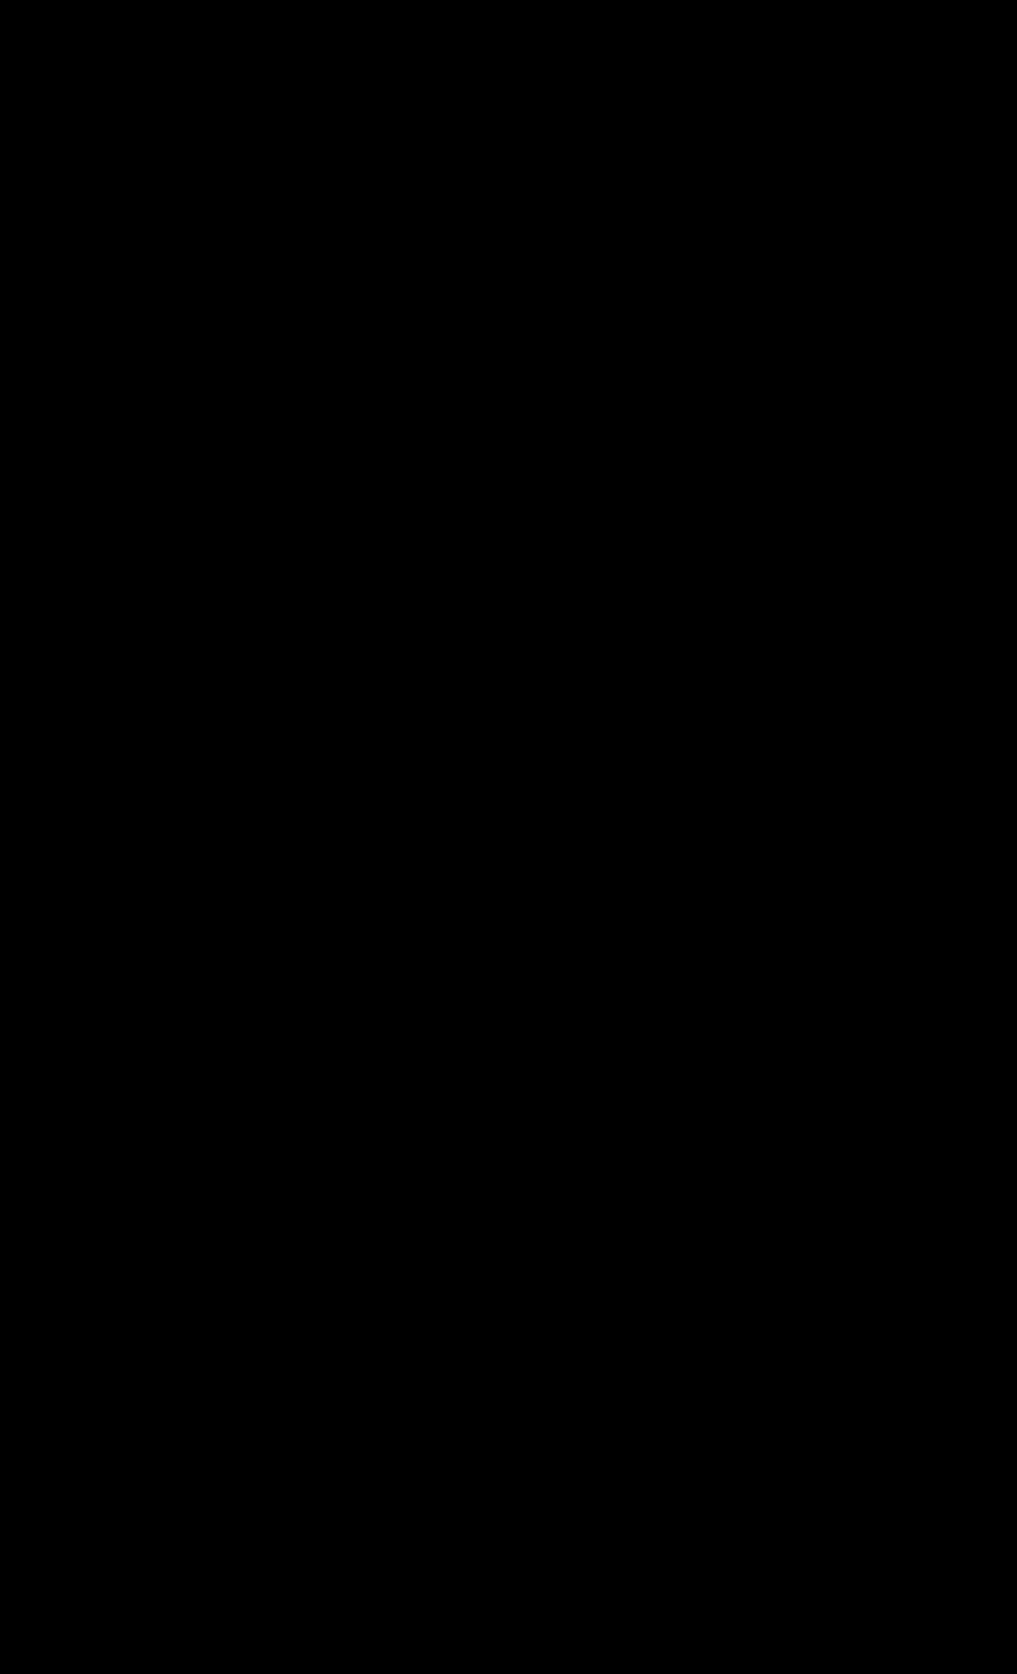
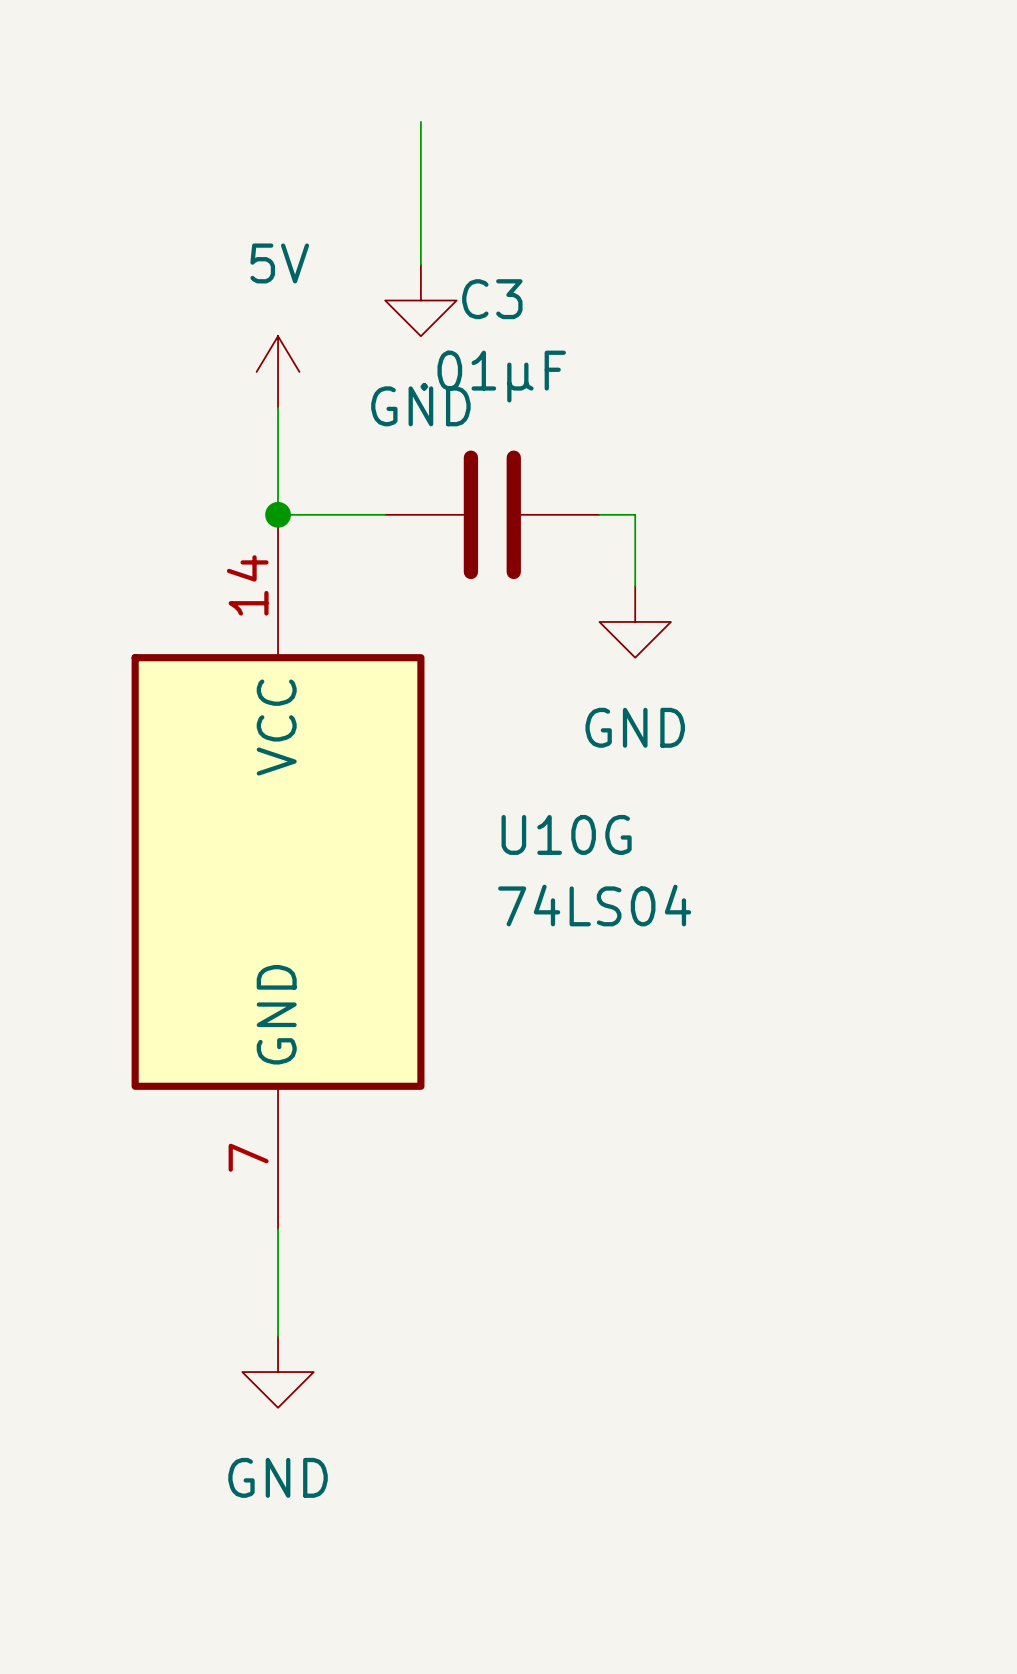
wire: none -> (420, 121) (420, 264)
power symbol: none -> GND (420, 300)
power symbol: none -> 5V (278, 371)
wire: none -> (278, 407) (278, 514) (385, 514)
junction: none -> (278, 514)
C3: none -> .01µF (492, 514)
wire: none -> (599, 514) (635, 514) (635, 586)
power symbol: none -> GND (635, 621)
U10G: none -> 74LS04 (278, 871)
wire: none -> (278, 1229) (278, 1336)
power symbol: none -> GND (278, 1372)

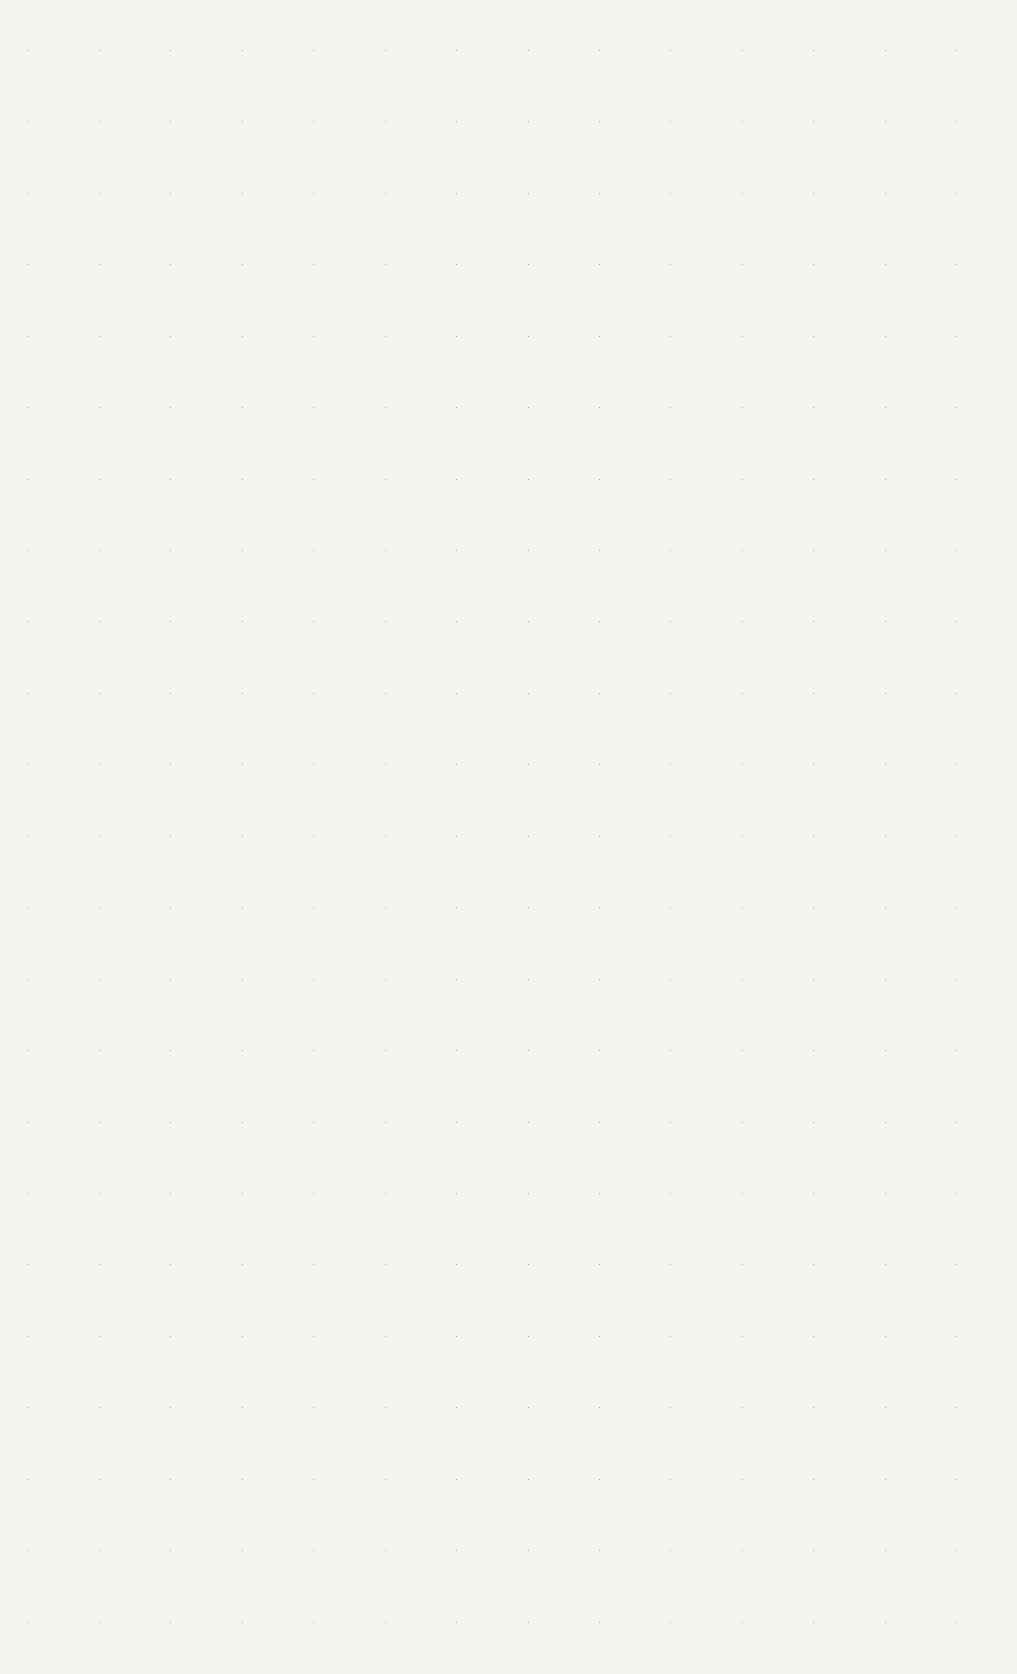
wire: (420, 121) (420, 264) -> none
power symbol: GND (420, 300) -> none
power symbol: 5V (278, 371) -> none
wire: (278, 407) (278, 514) (385, 514) -> none
junction: (278, 514) -> none
C3: .01µF (492, 514) -> none
wire: (599, 514) (635, 514) (635, 586) -> none
power symbol: GND (635, 621) -> none
U10G: 74LS04 (278, 871) -> none
wire: (278, 1229) (278, 1336) -> none
power symbol: GND (278, 1372) -> none

